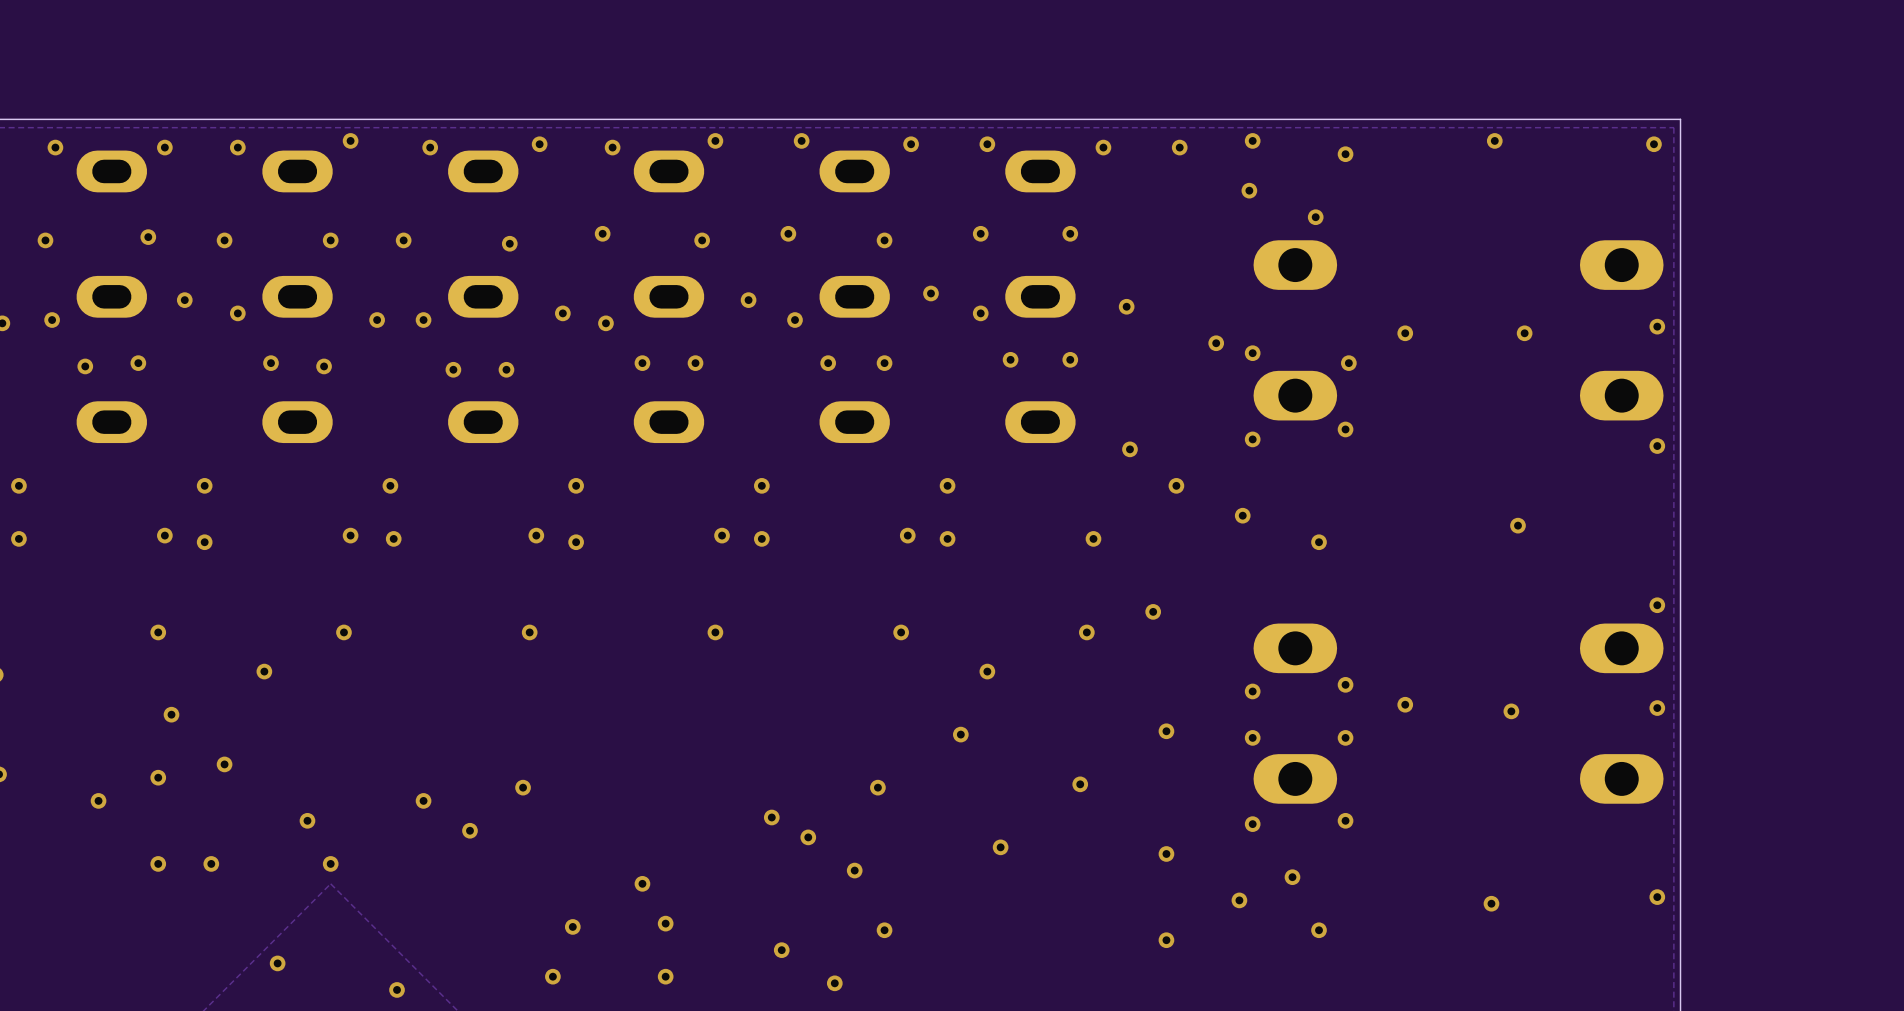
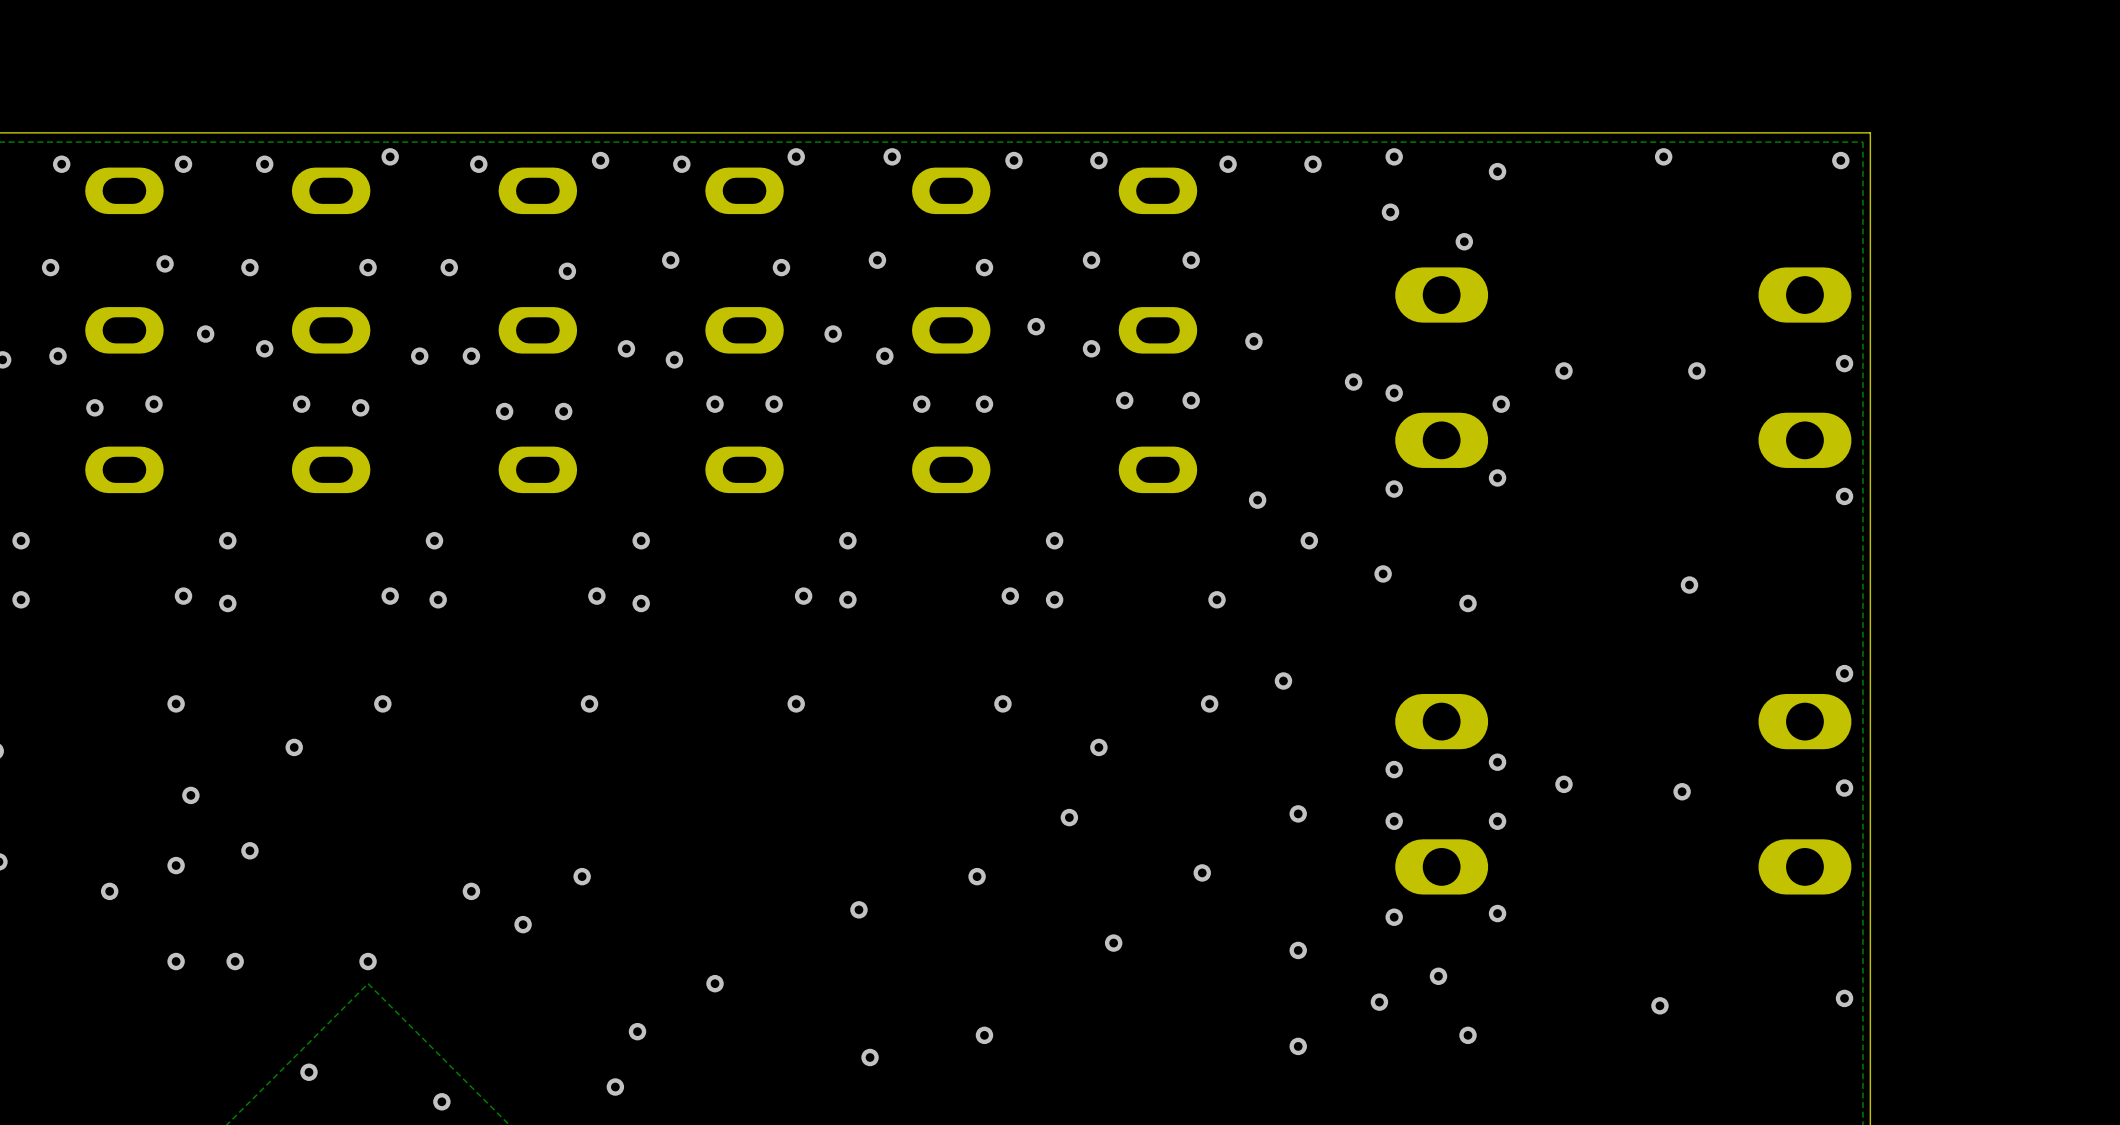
via: (307, 820) -> none
via: (808, 837) -> none
via: (854, 870) -> none
via: (665, 923) -> none
via: (665, 976) -> none
via: (834, 983) -> none

